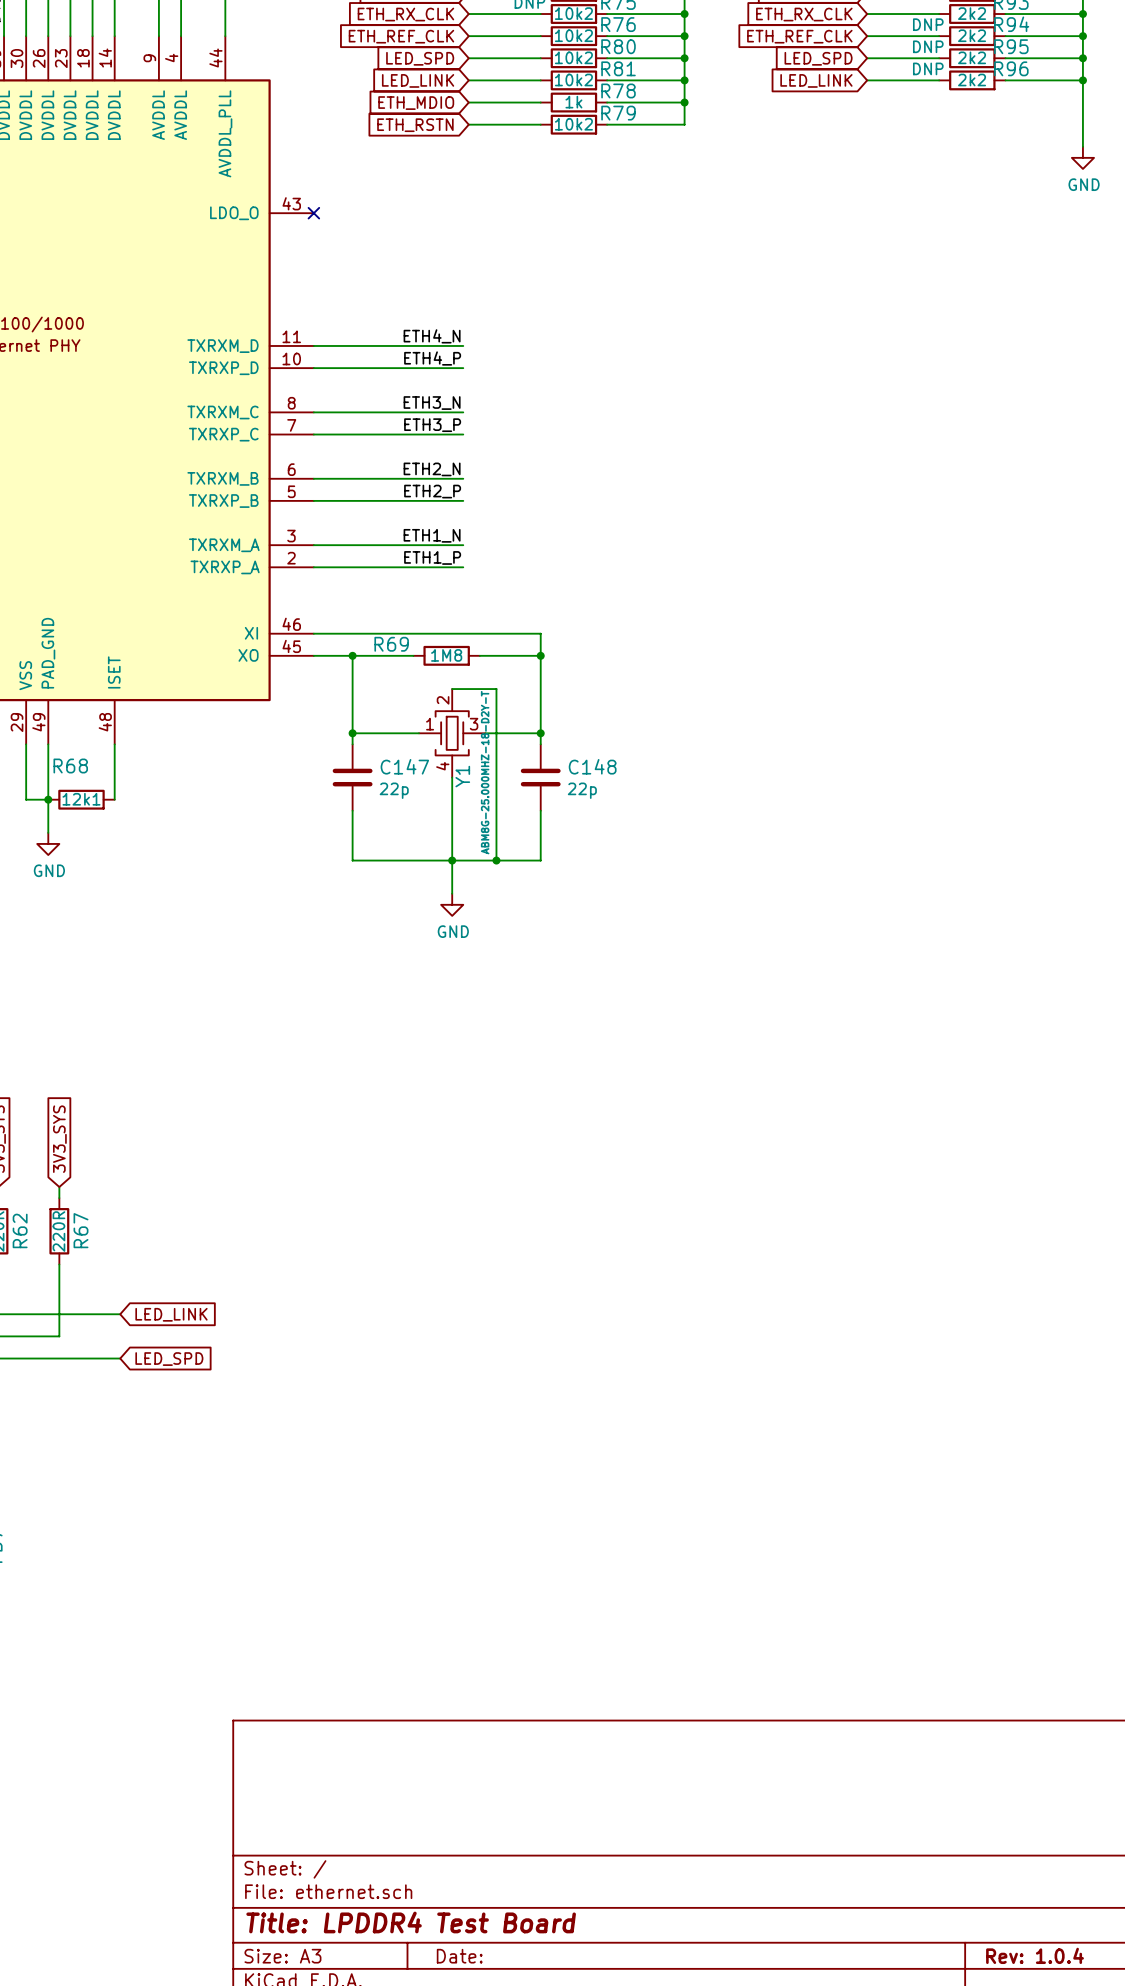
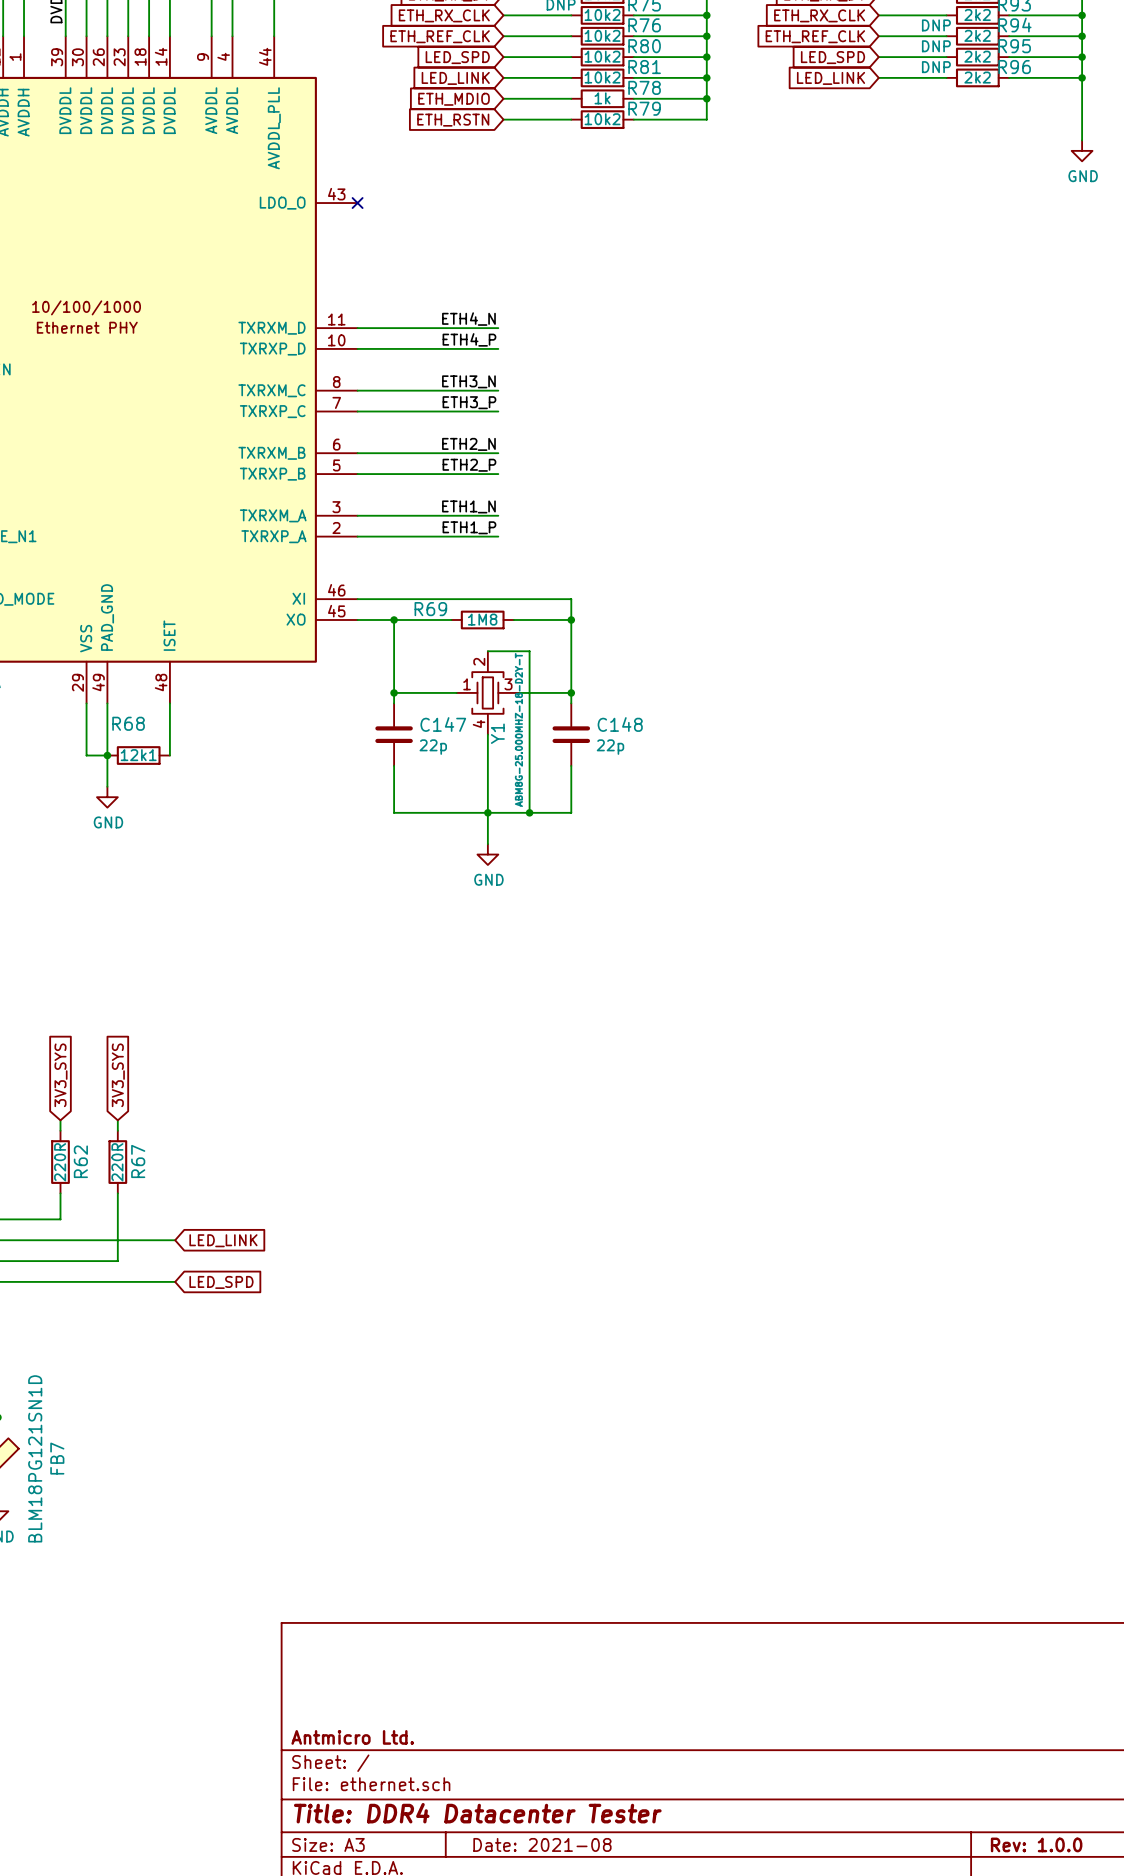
title block: none -> Antmicro Ltd. (352, 1737)
title block: Title: LPDDR4 Test Board (411, 1922) -> Title: DDR4 Datacenter Tester (477, 1813)
title block: Rev: 1.0.4 (1035, 1955) -> Rev: 1.0.0 (1036, 1844)
title block: Date: (459, 1956) -> Date: 2021-08 (542, 1844)

